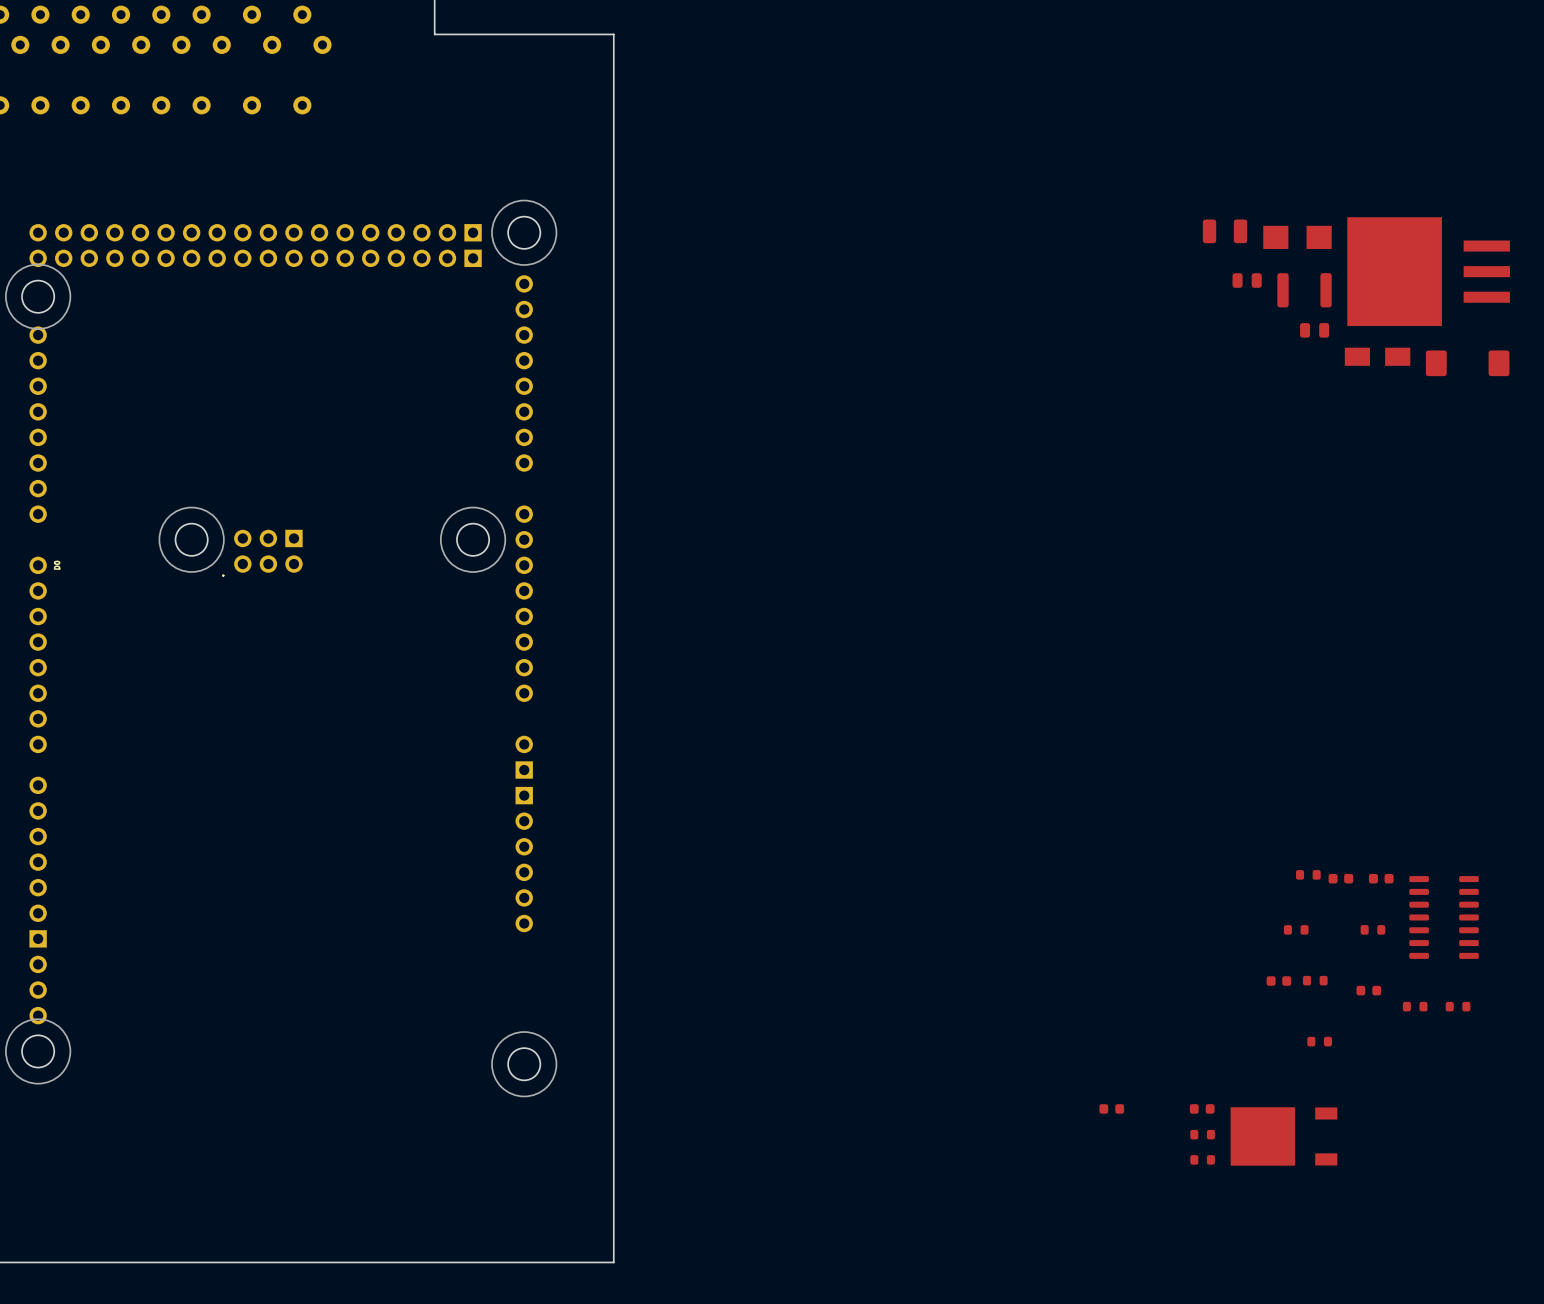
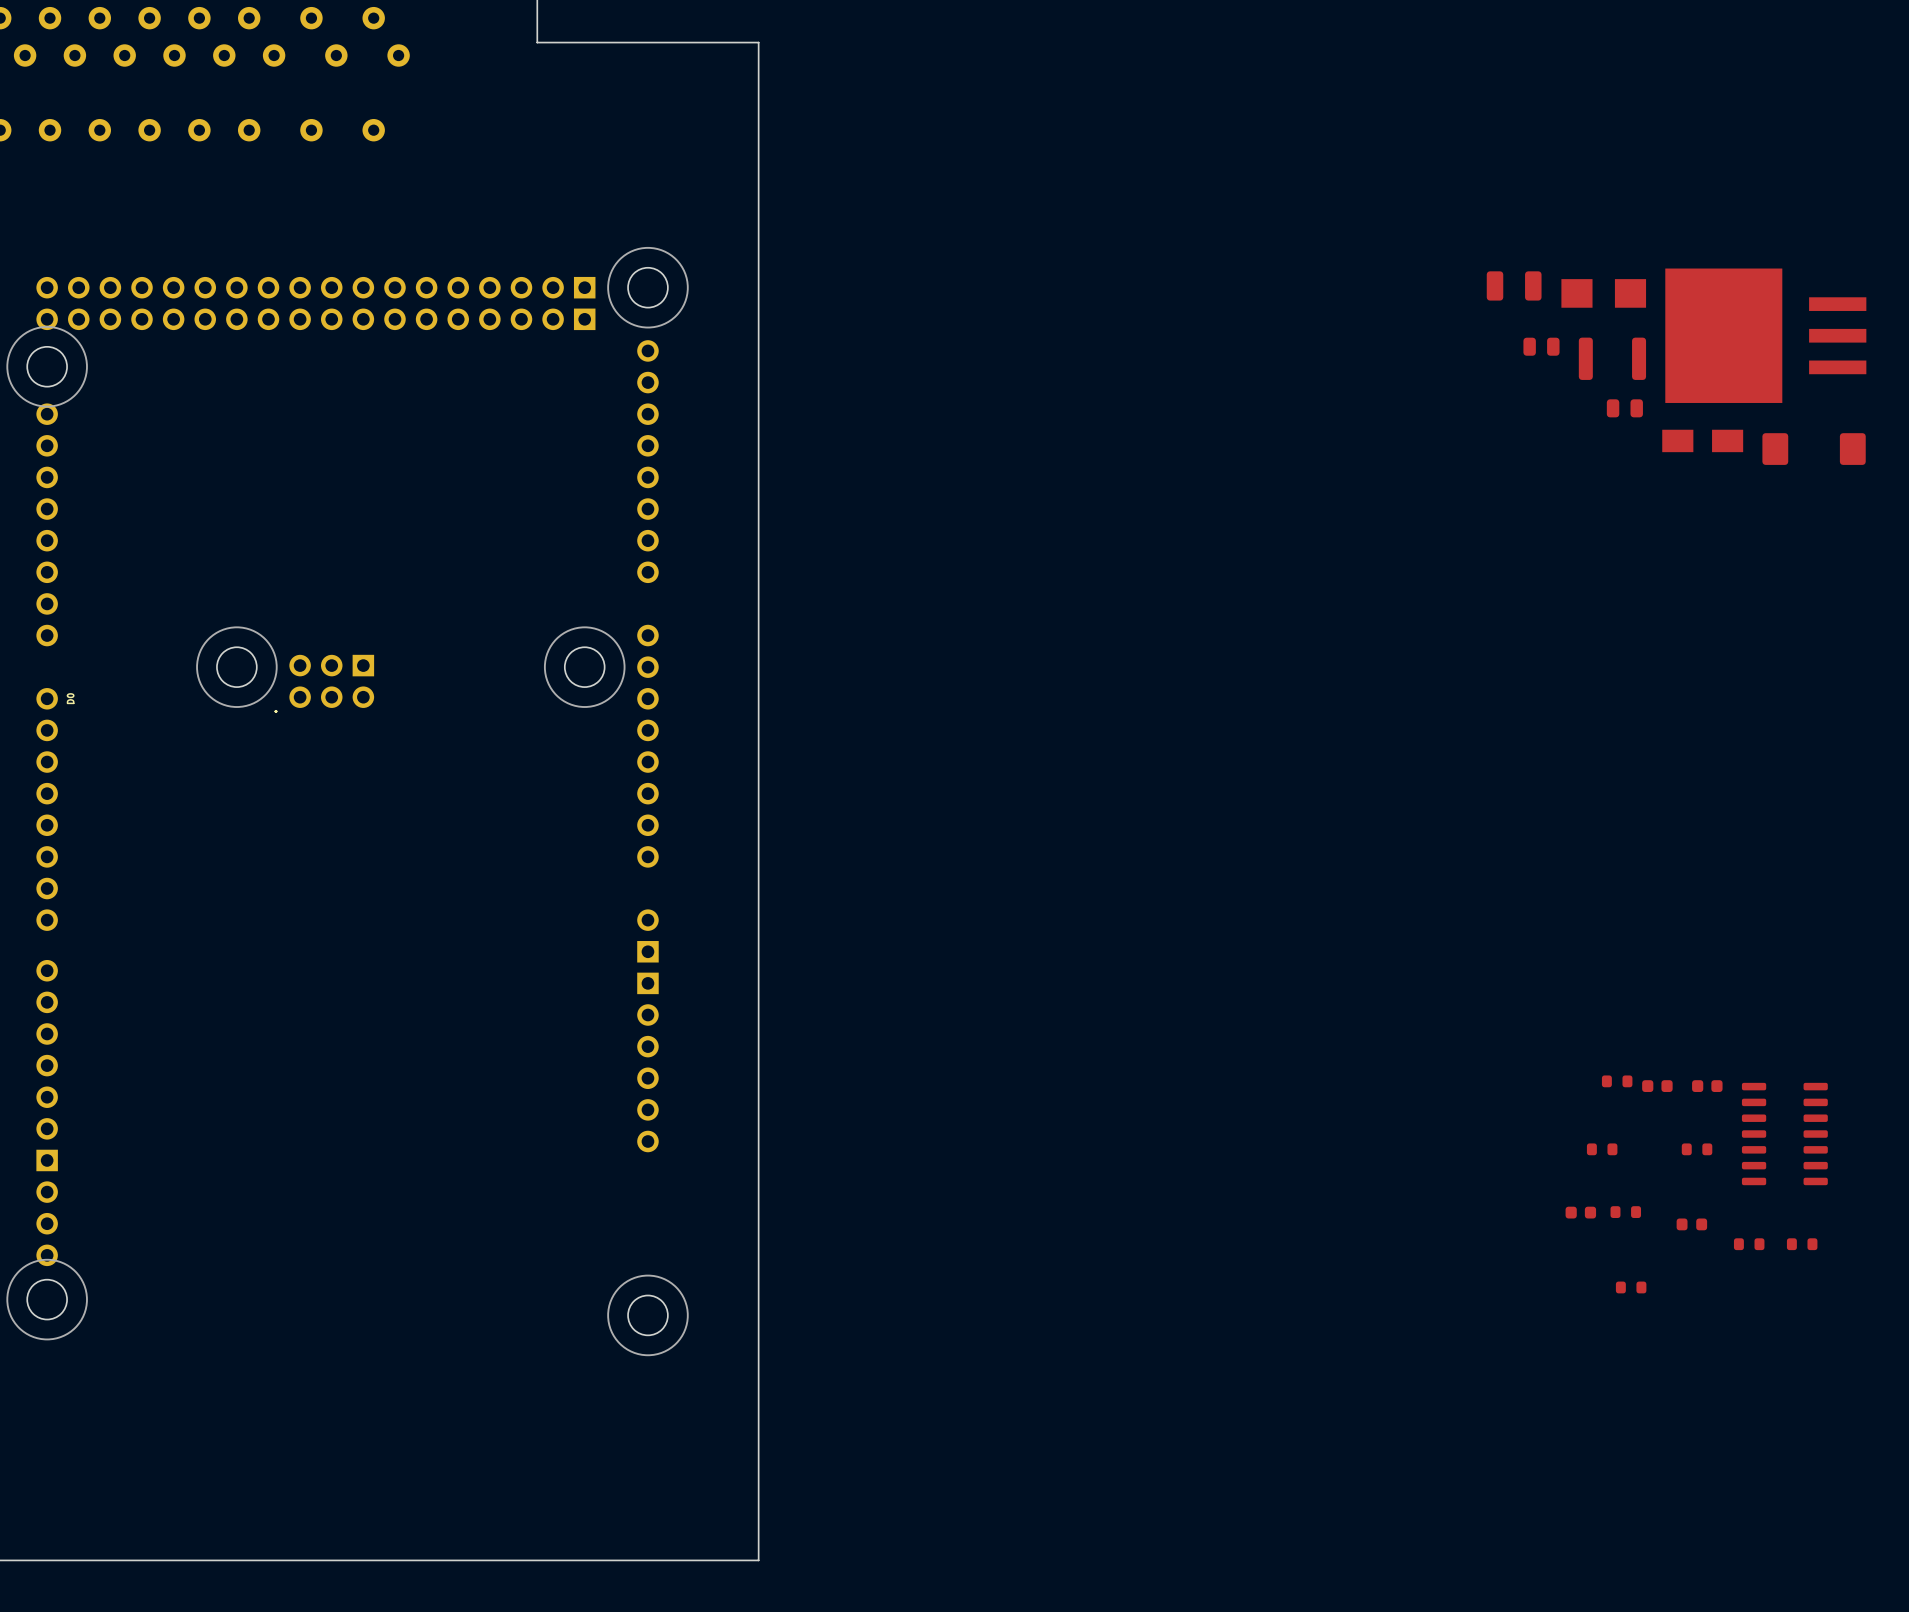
part: (1111, 1108) -> none
part: (1202, 1108) -> none
part: (1202, 1134) -> none
part: (1283, 1136) -> none
part: (1202, 1159) -> none

